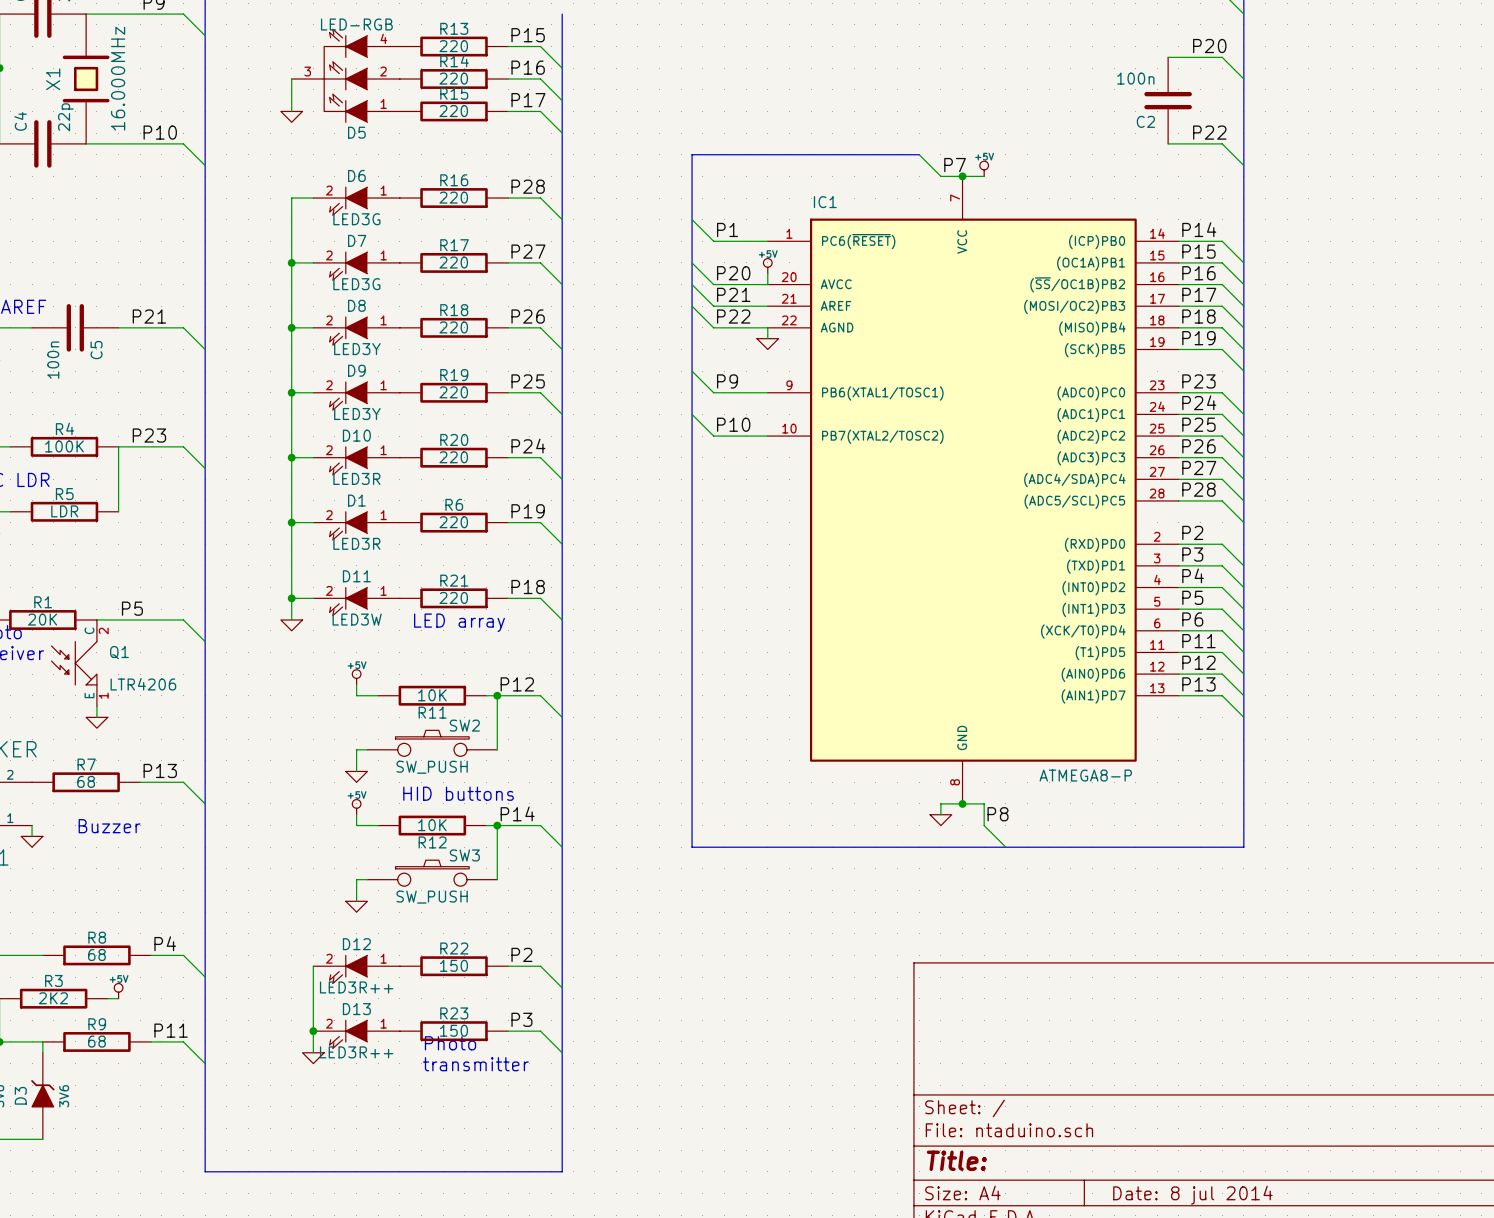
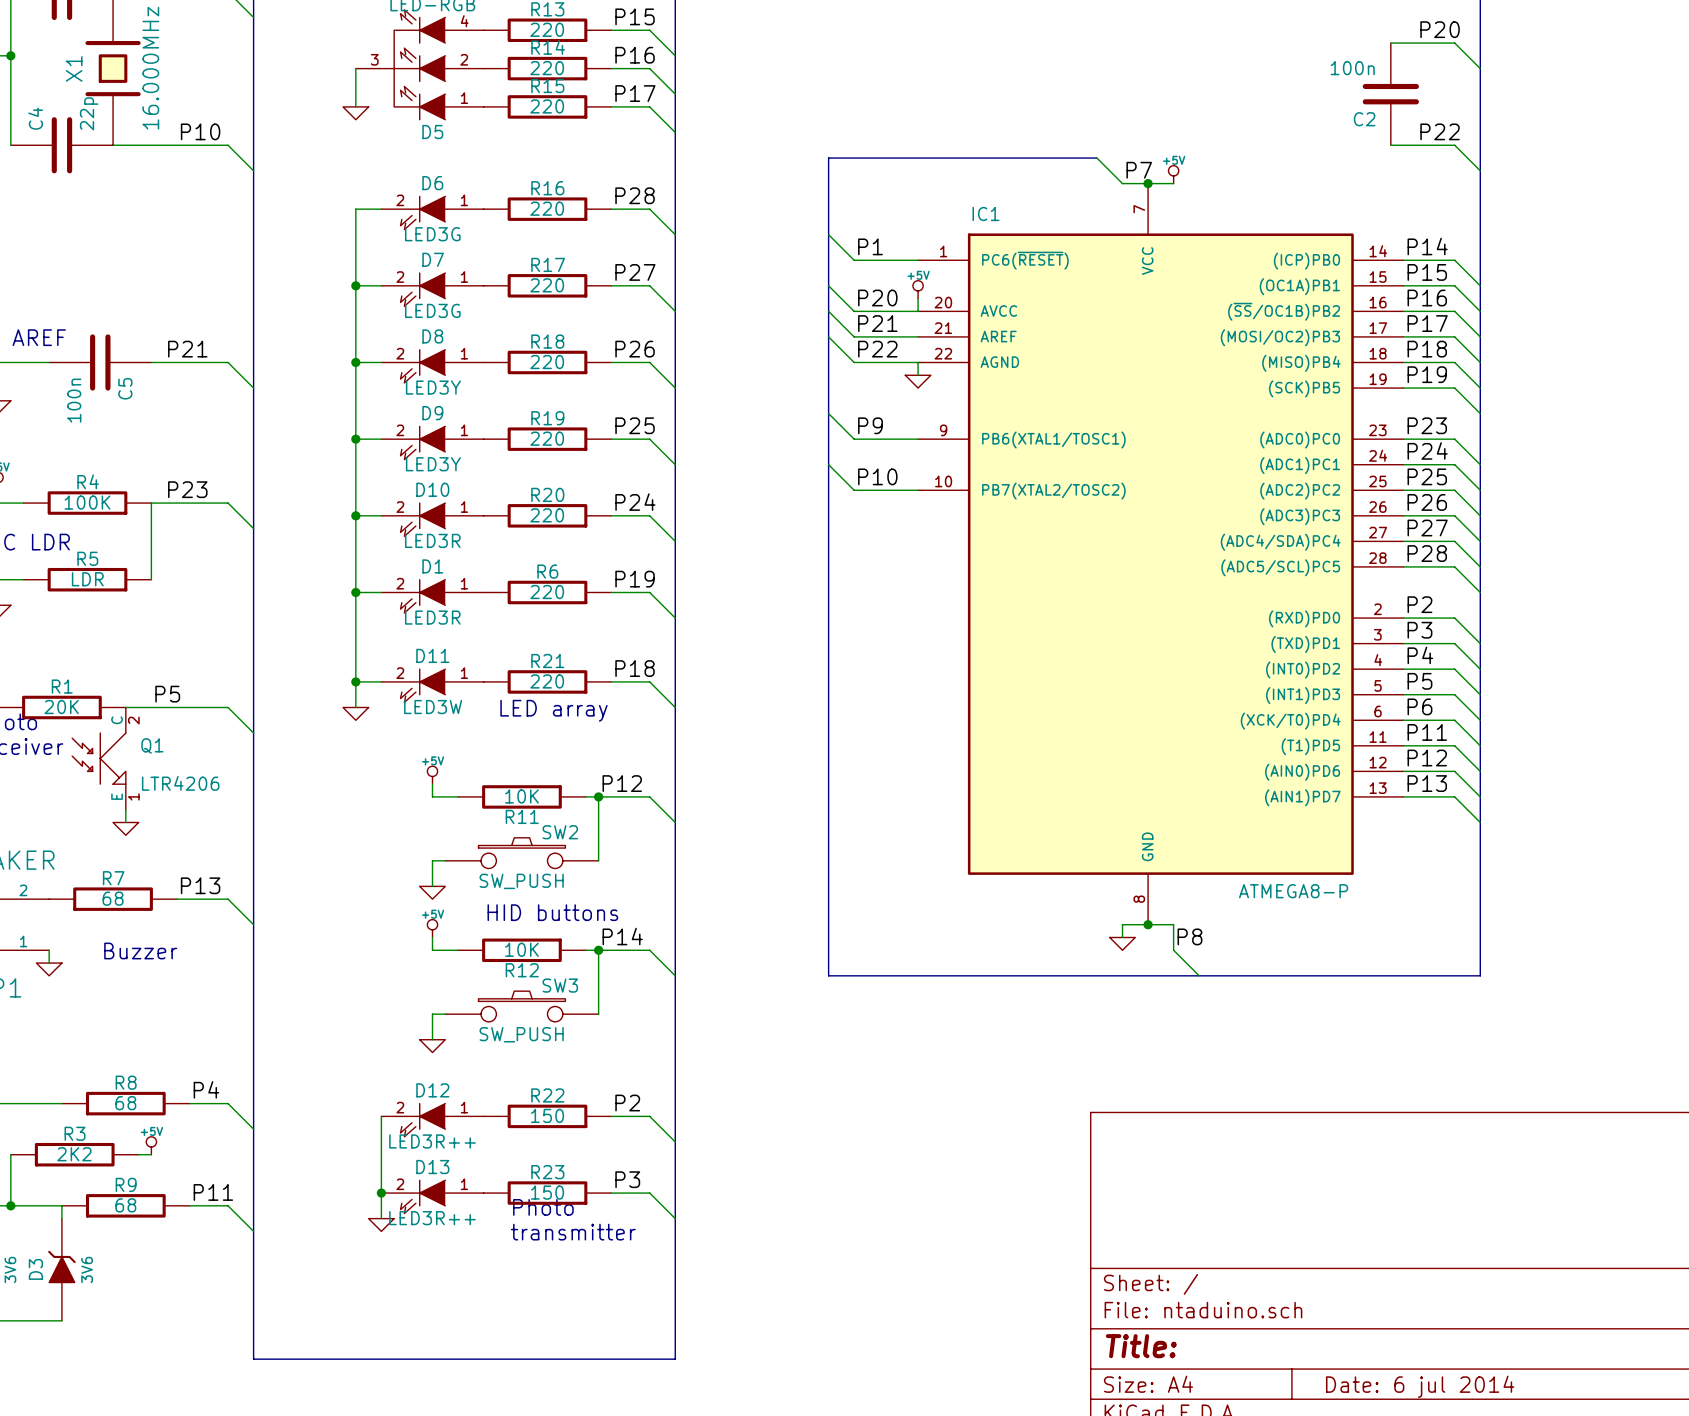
title block: Date: 8 jul 2014 (1192, 1195) -> Date: 6 jul 2014 (1420, 1386)

